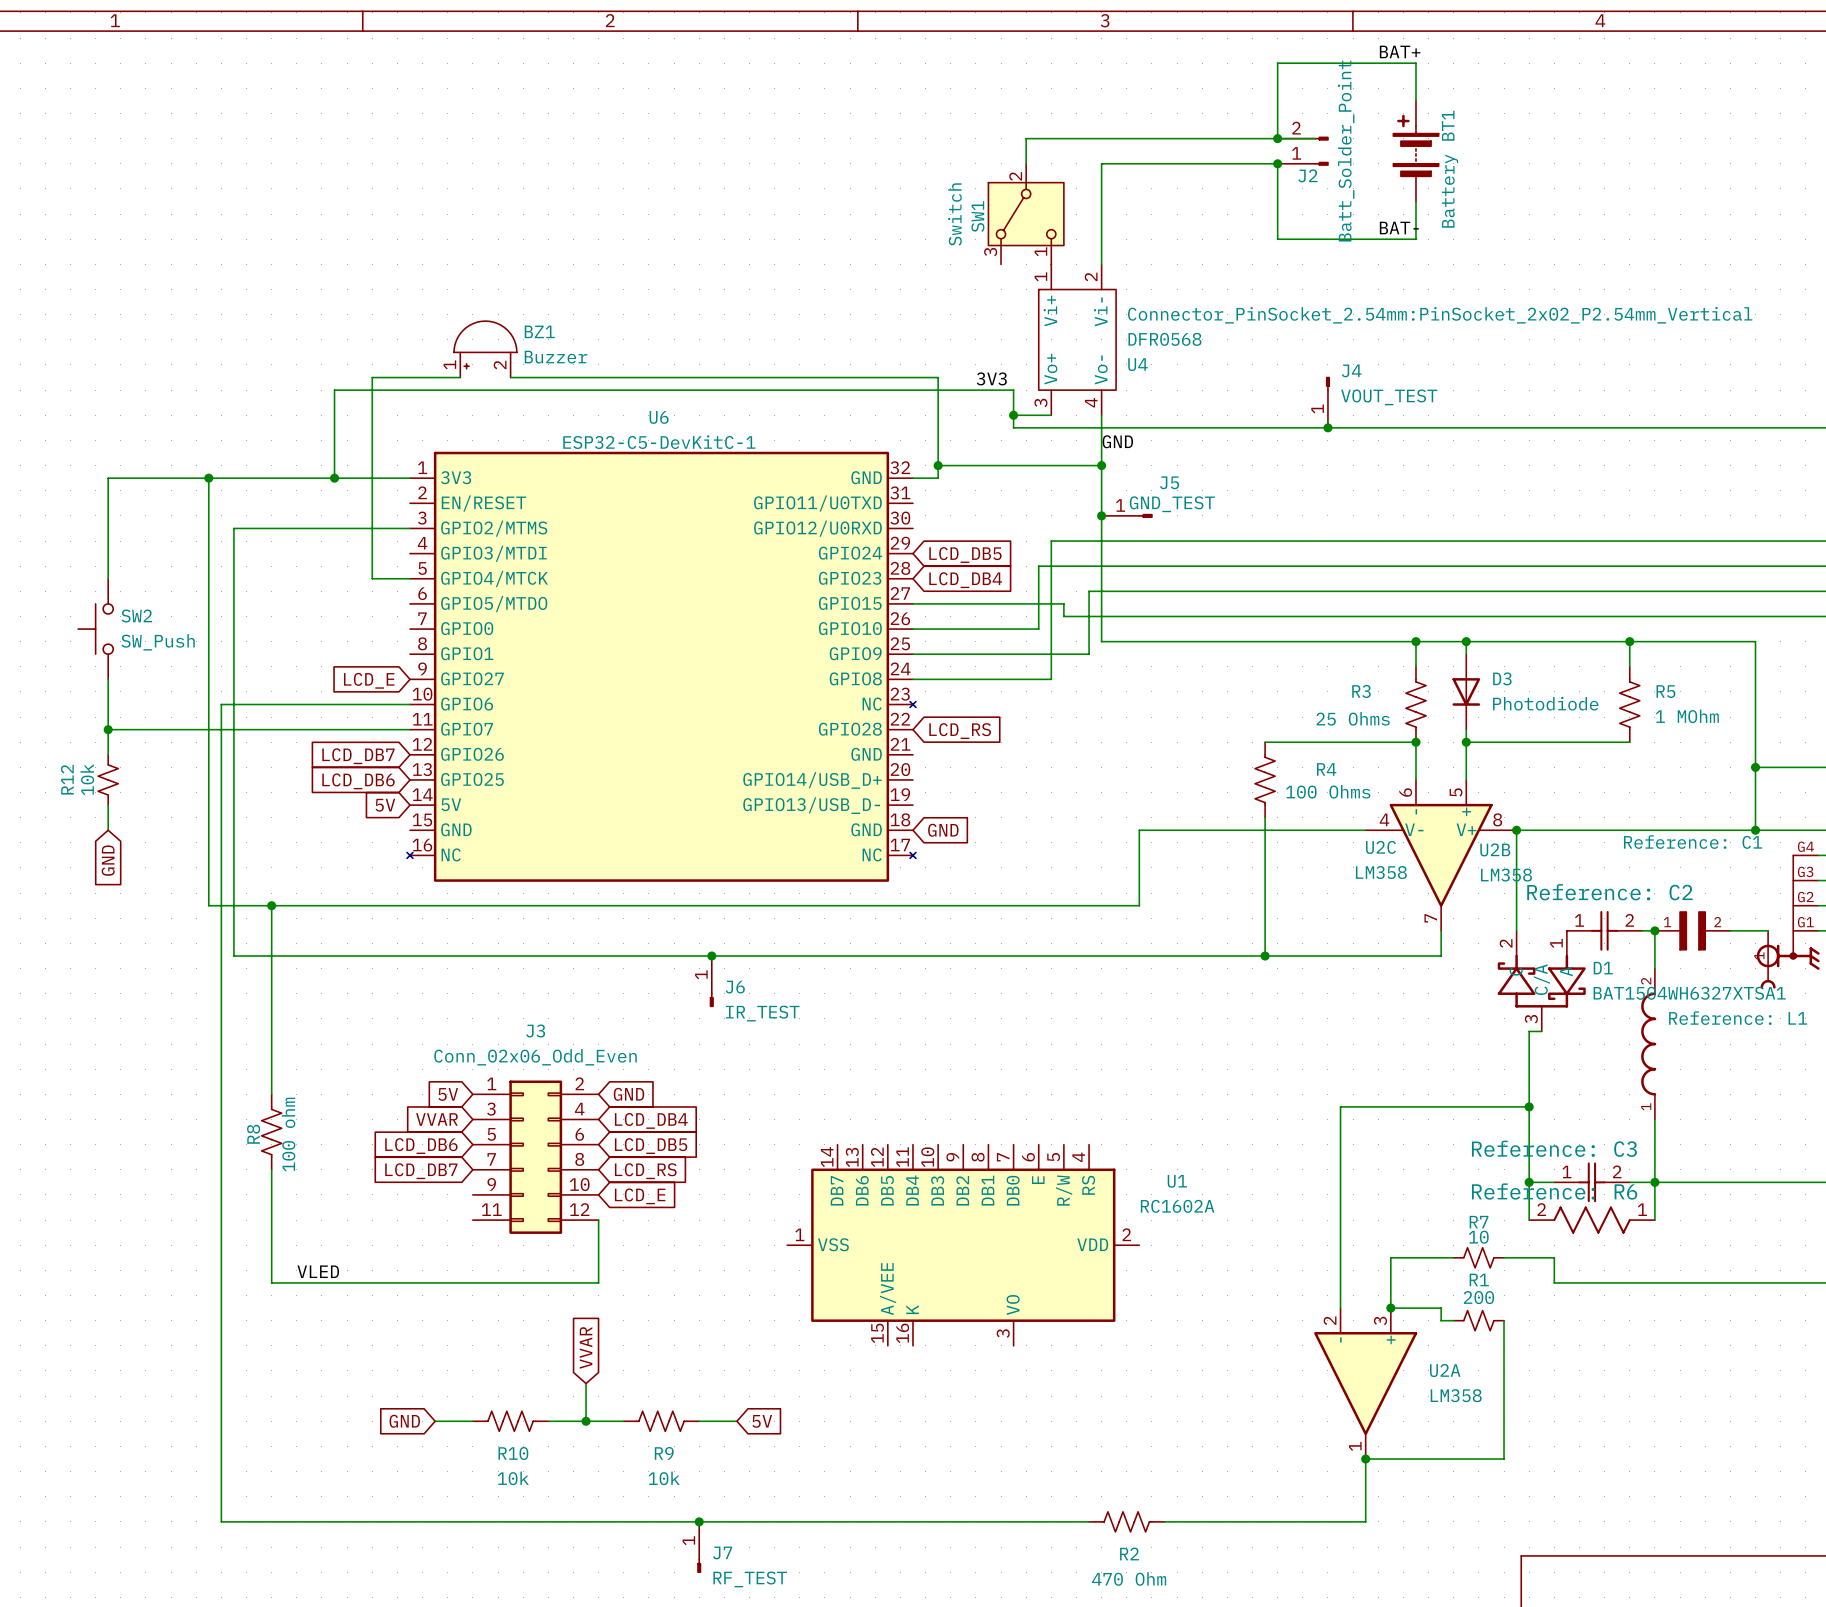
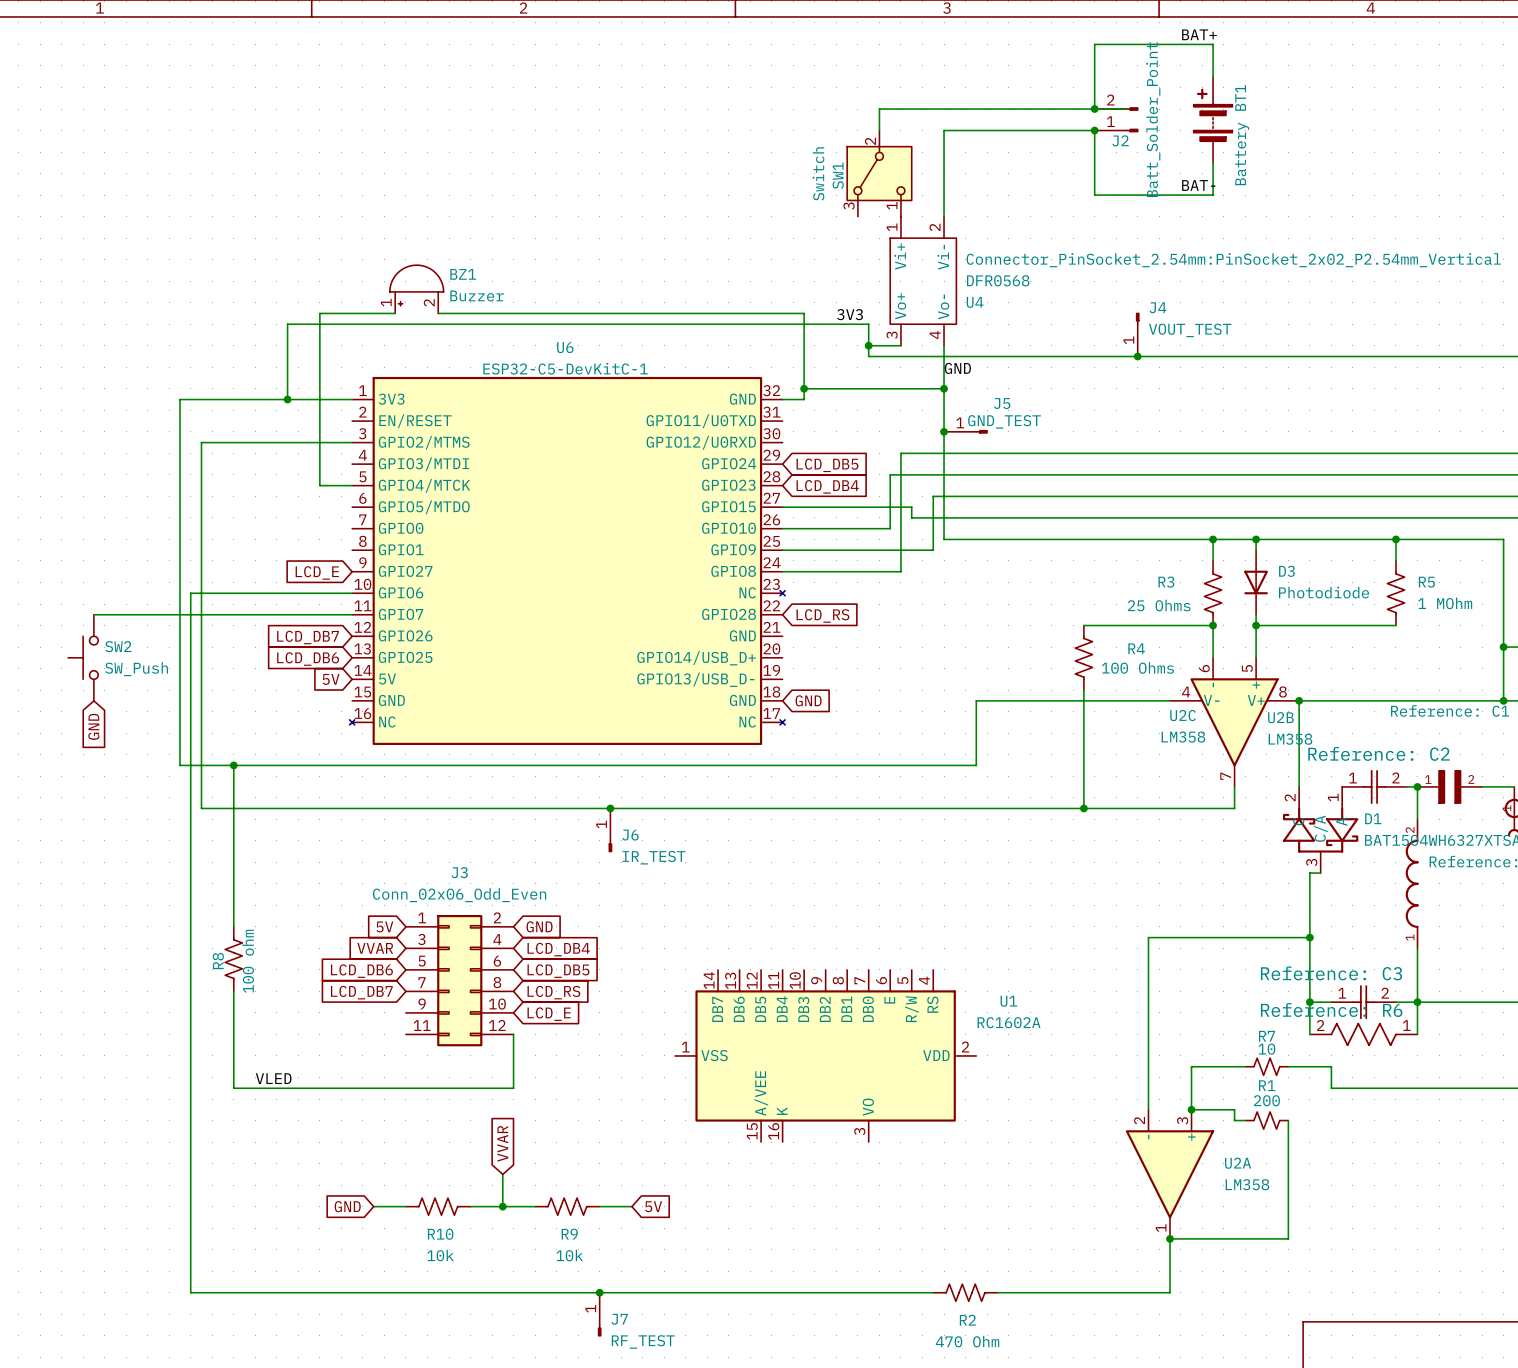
wire: (208, 478) (108, 478) (108, 578) -> none
junction: (208, 478) -> none
SW2 position: (95, 629) -> (83, 657)
wire: (108, 679) (108, 754) -> none
junction: (108, 729) -> none
R12: 10k (108, 779) -> none

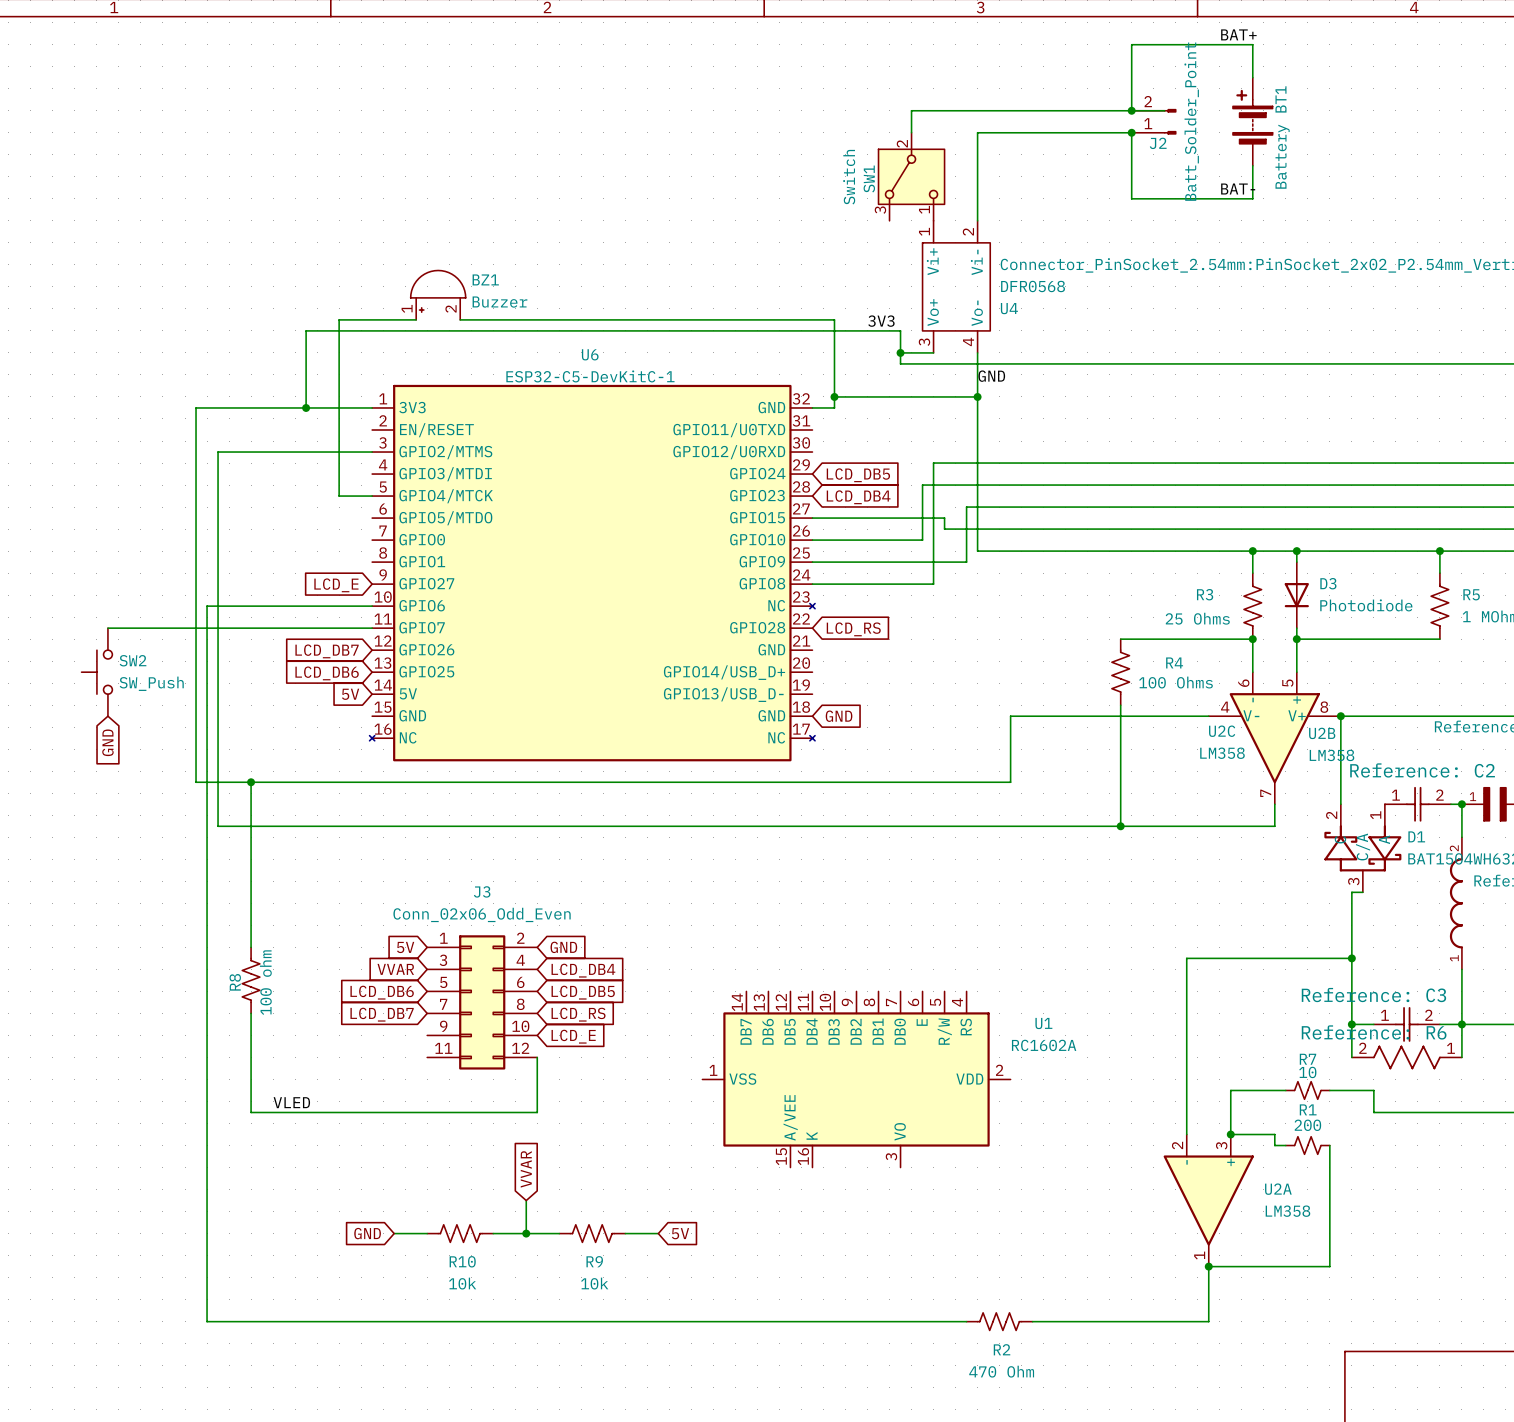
J4: VOUT_TEST (1137, 334) -> none
junction: (1137, 356) -> none
junction: (944, 431) -> none
J5: GND_TEST (965, 431) -> none
junction: (610, 808) -> none
J6: IR_TEST (610, 830) -> none
junction: (599, 1292) -> none
J7: RF_TEST (599, 1314) -> none

